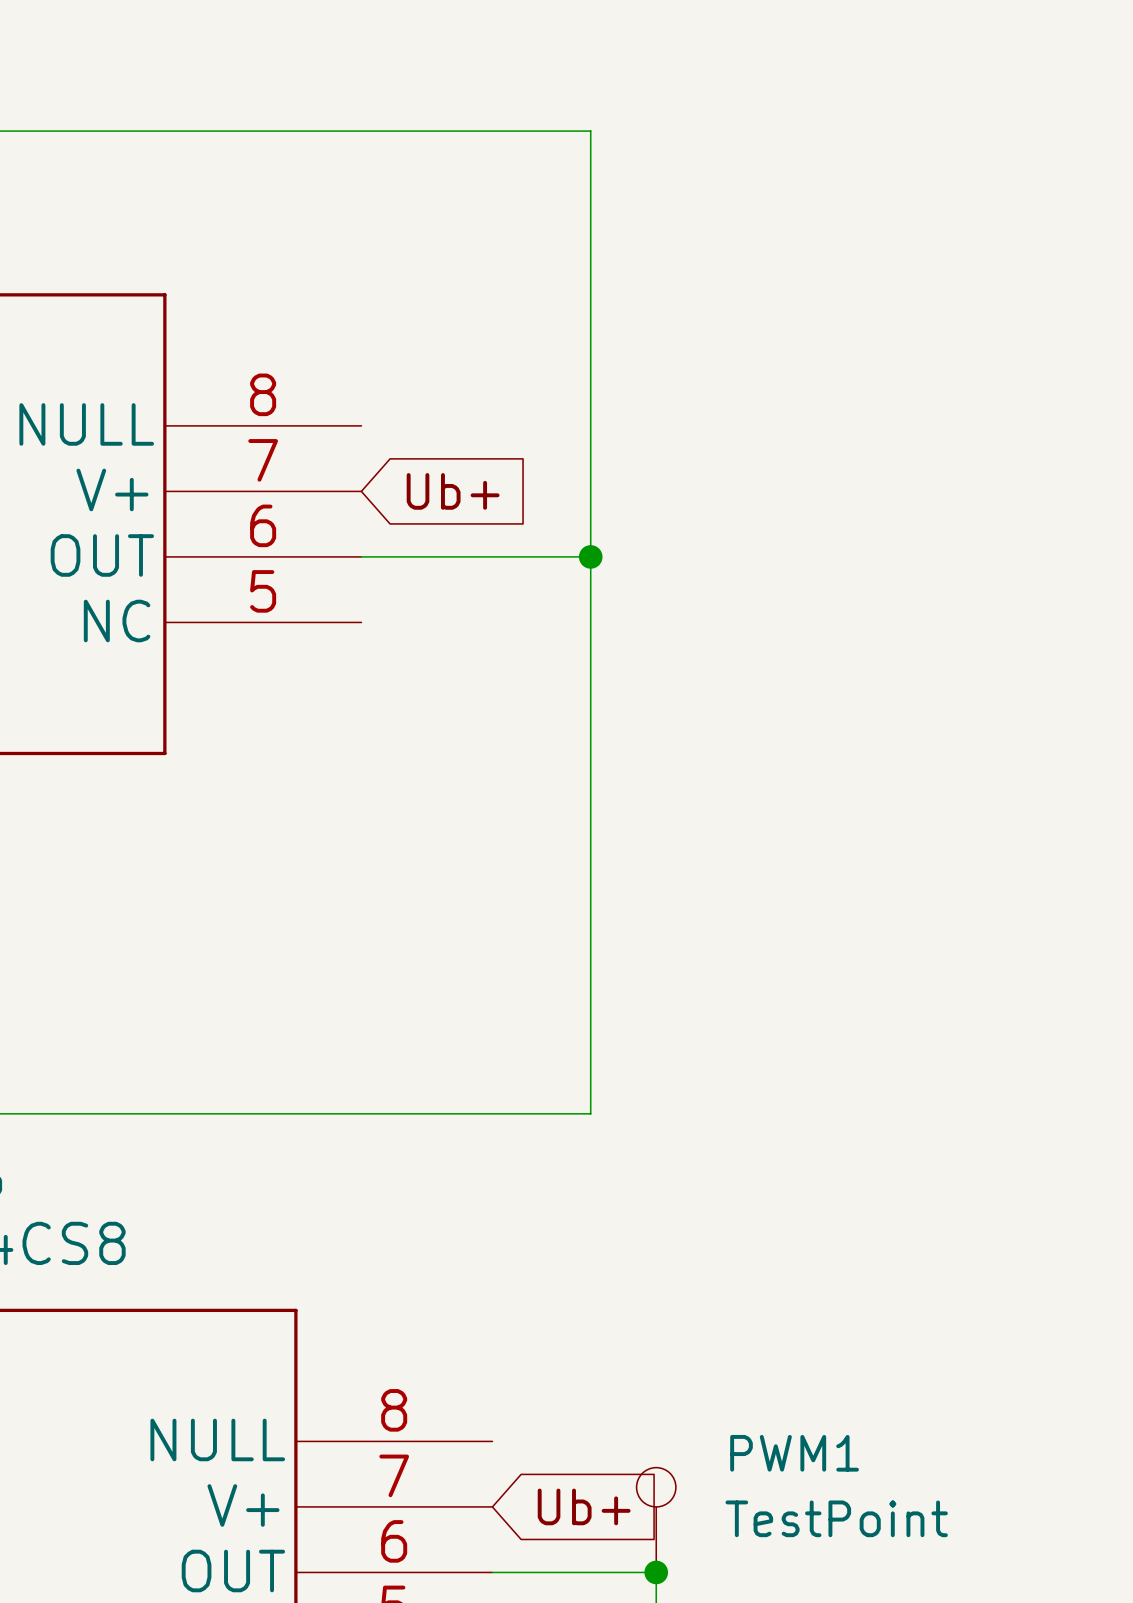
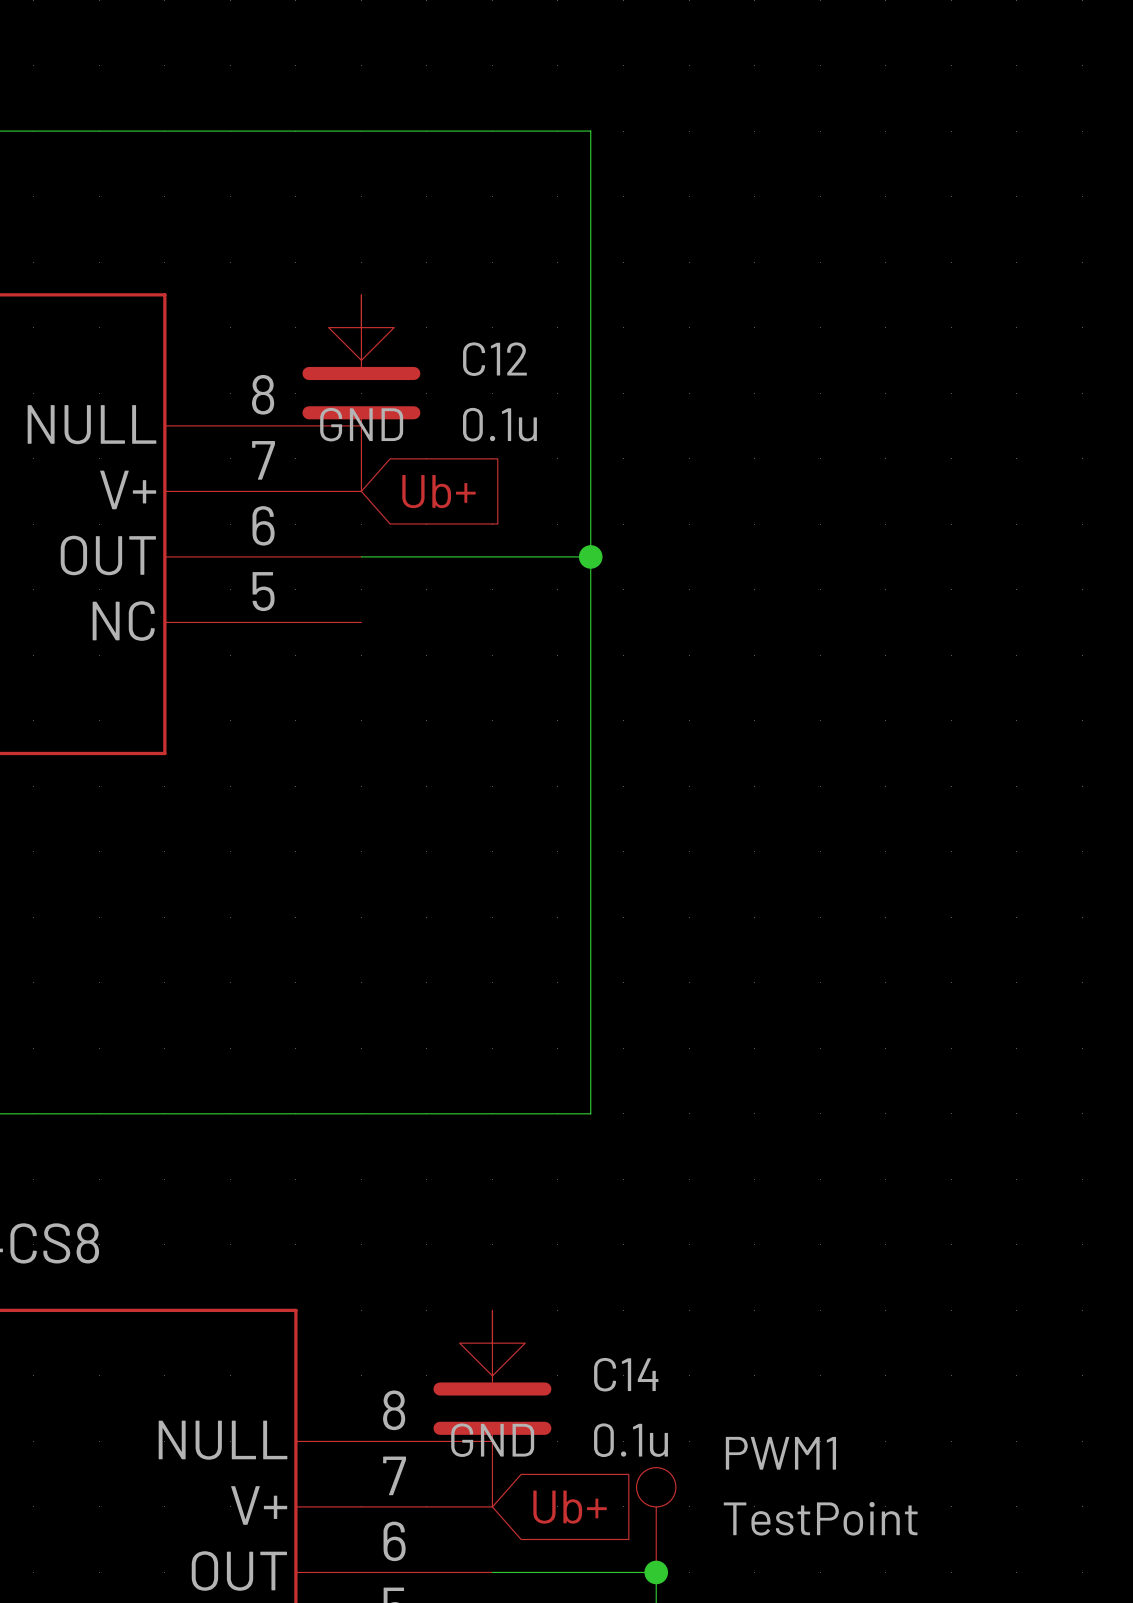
power symbol: none -> GND (361, 327)
C12: none -> 0.1u (361, 393)
power symbol: none -> GND (492, 1343)
C14: none -> 0.1u (492, 1408)

